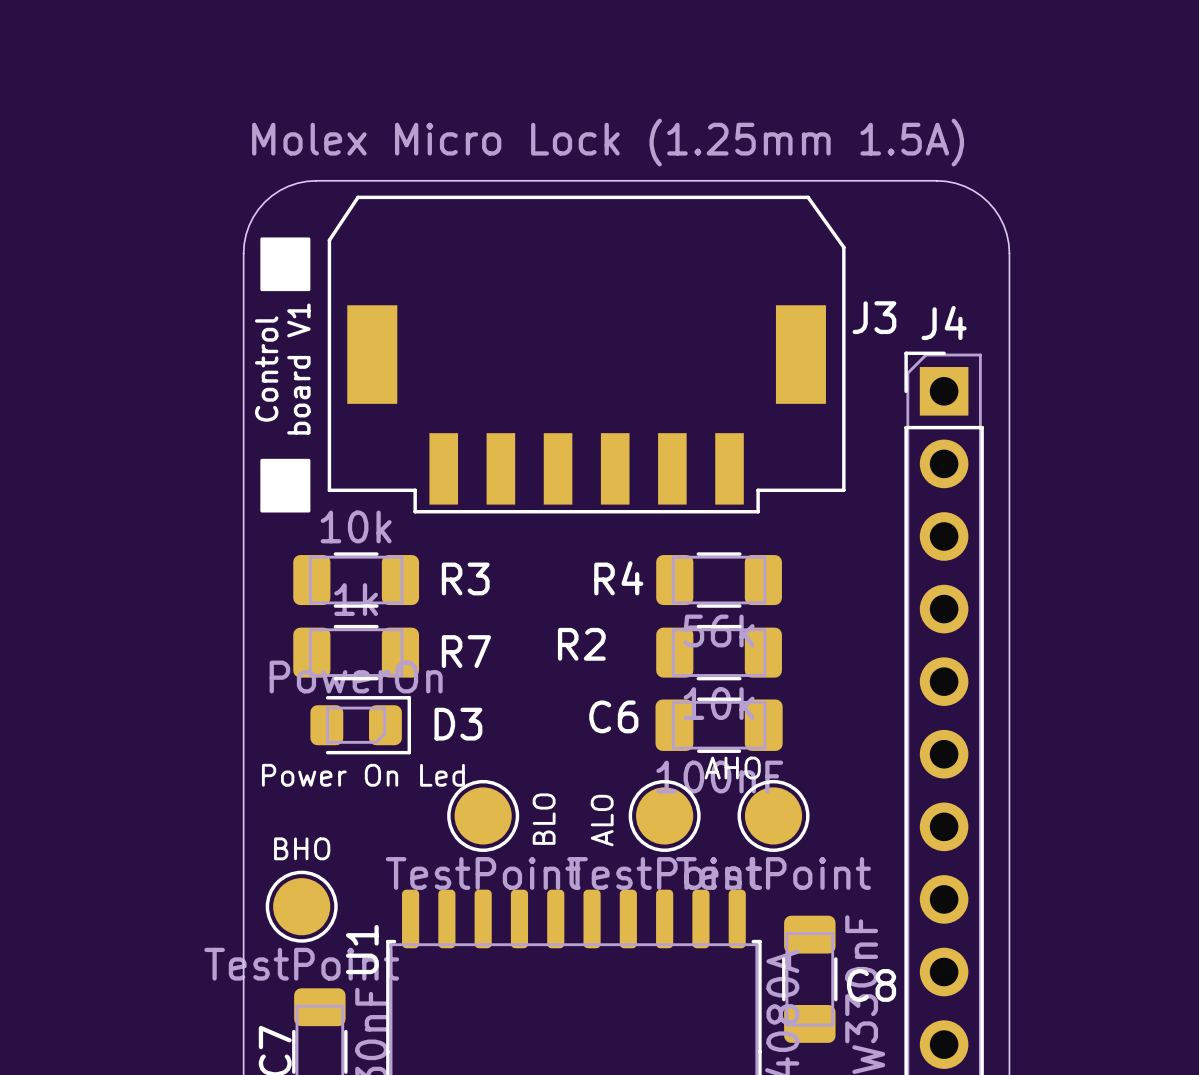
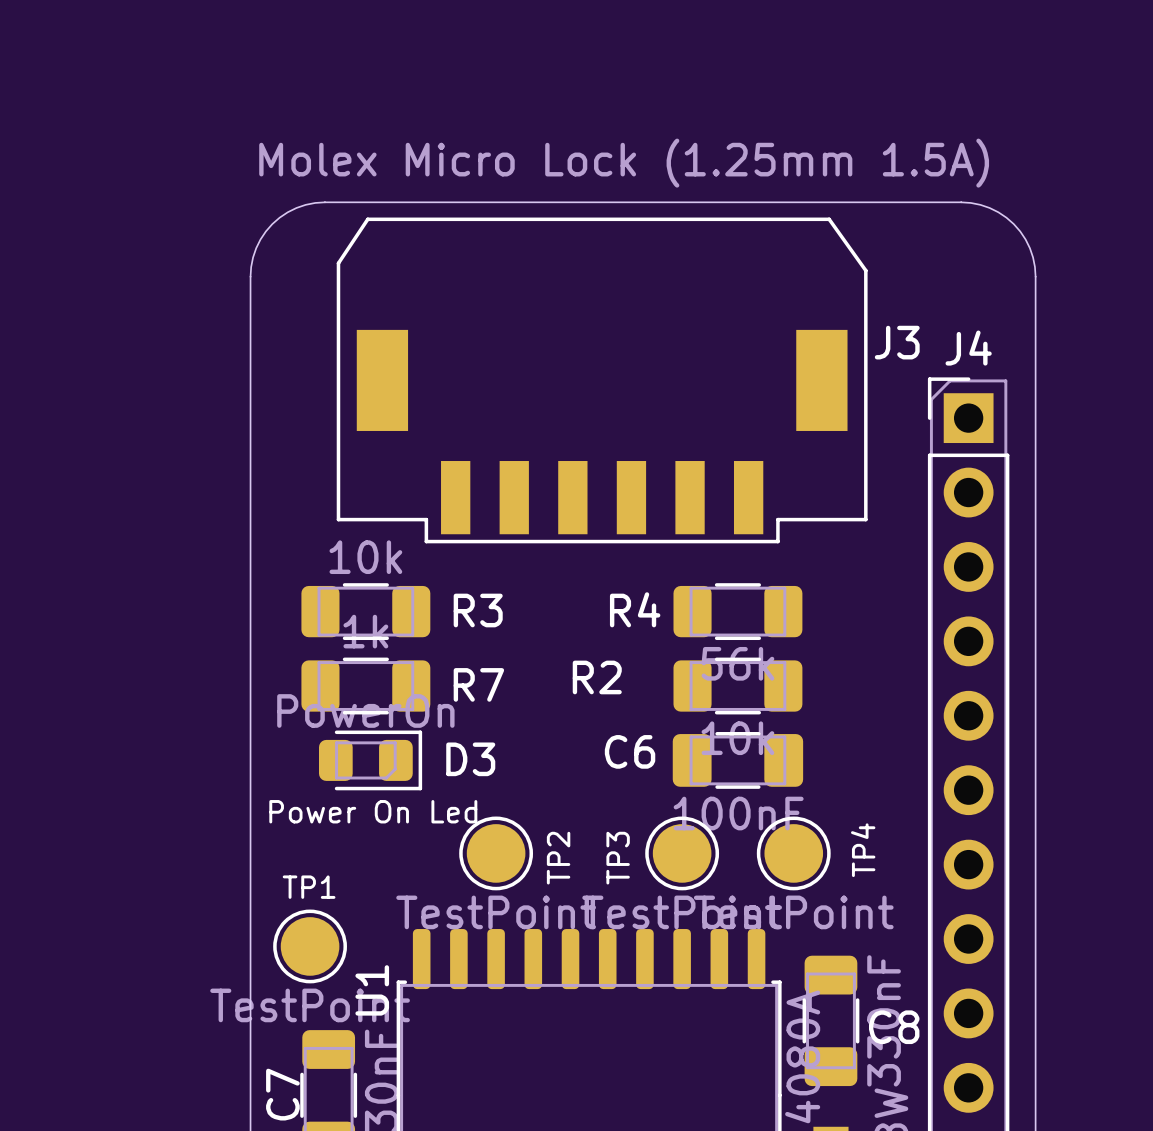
drawing: [260, 237, 311, 292] -> none
text: Control (266, 369) -> none
text: board V1 (298, 369) -> none
drawing: [260, 458, 311, 513] -> none
AHO name: AHO (732, 768) -> TP4 (863, 850)
BLO name: BLO (544, 819) -> TP2 (558, 858)
ALO name: ALO (602, 820) -> TP3 (618, 858)
BHO name: BHO (302, 848) -> TP1 (309, 887)

